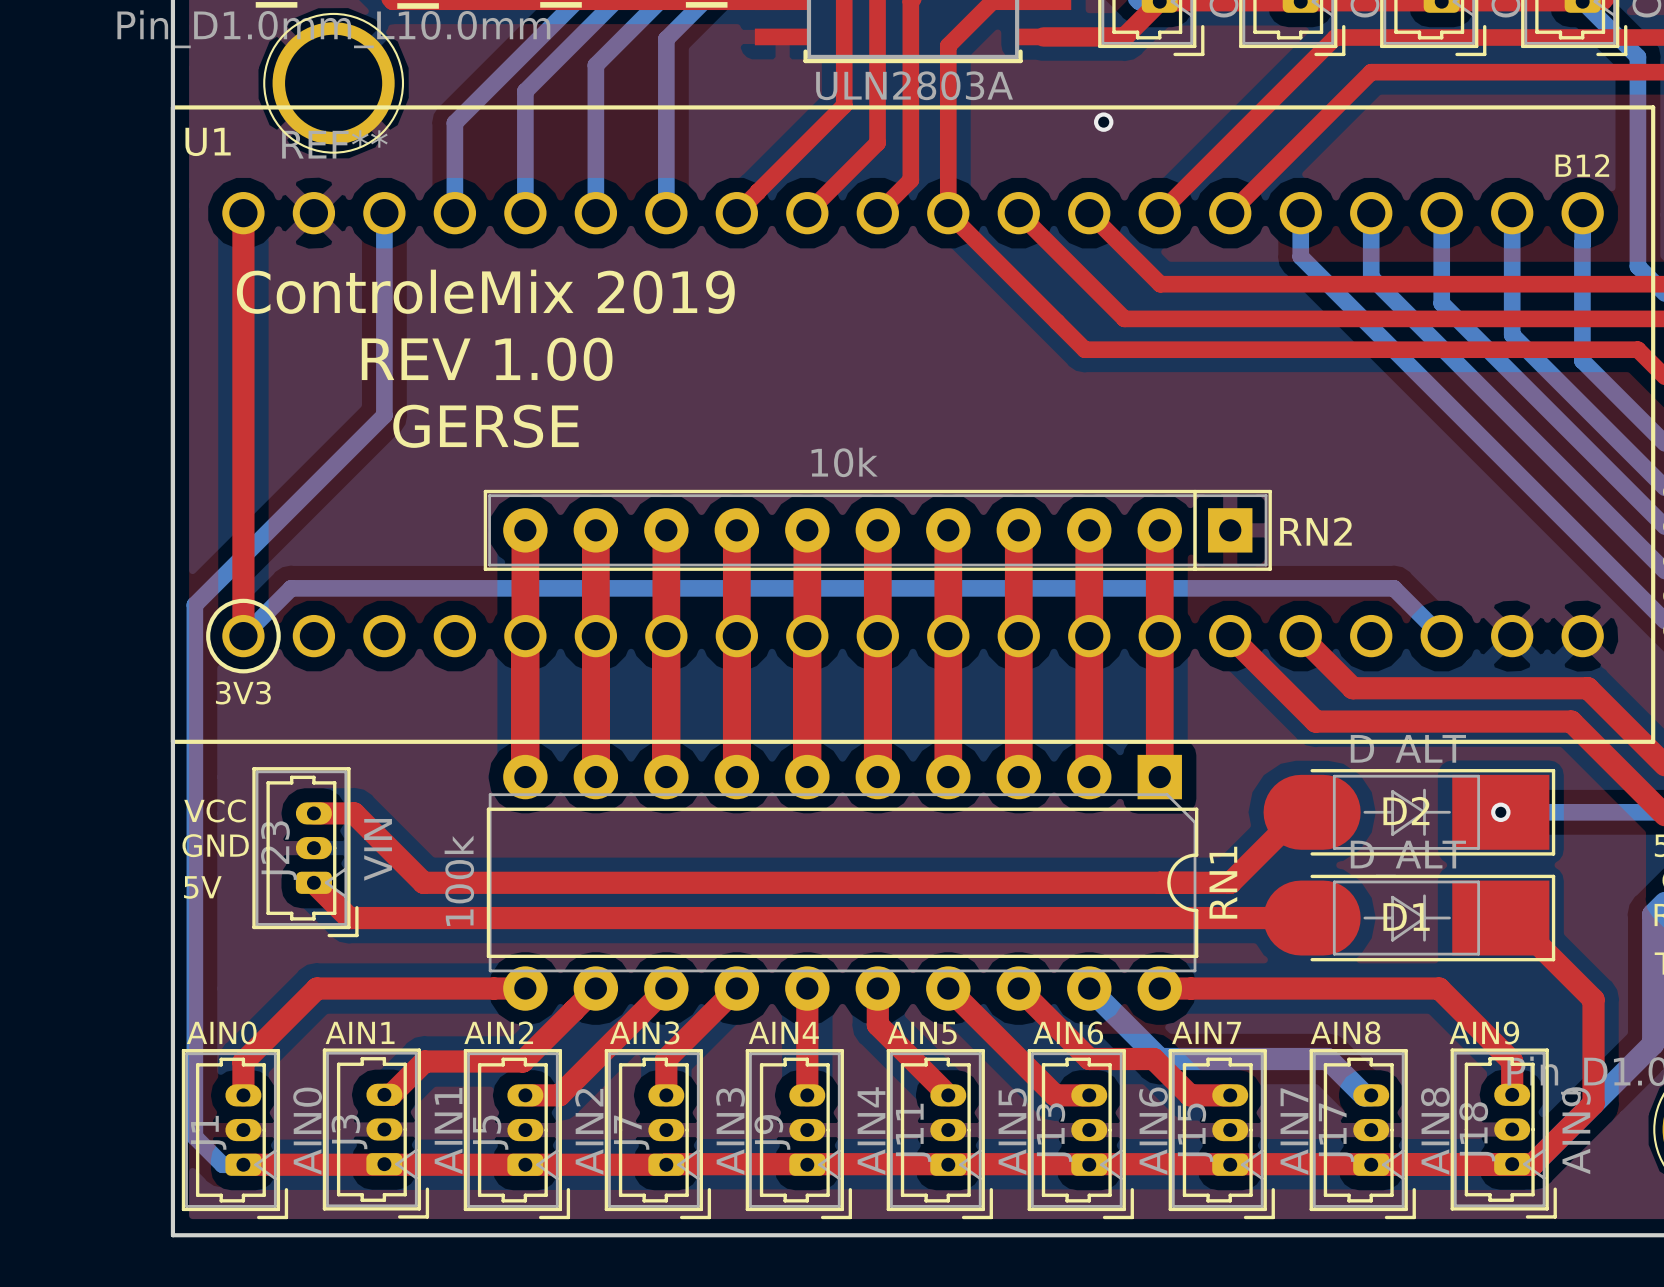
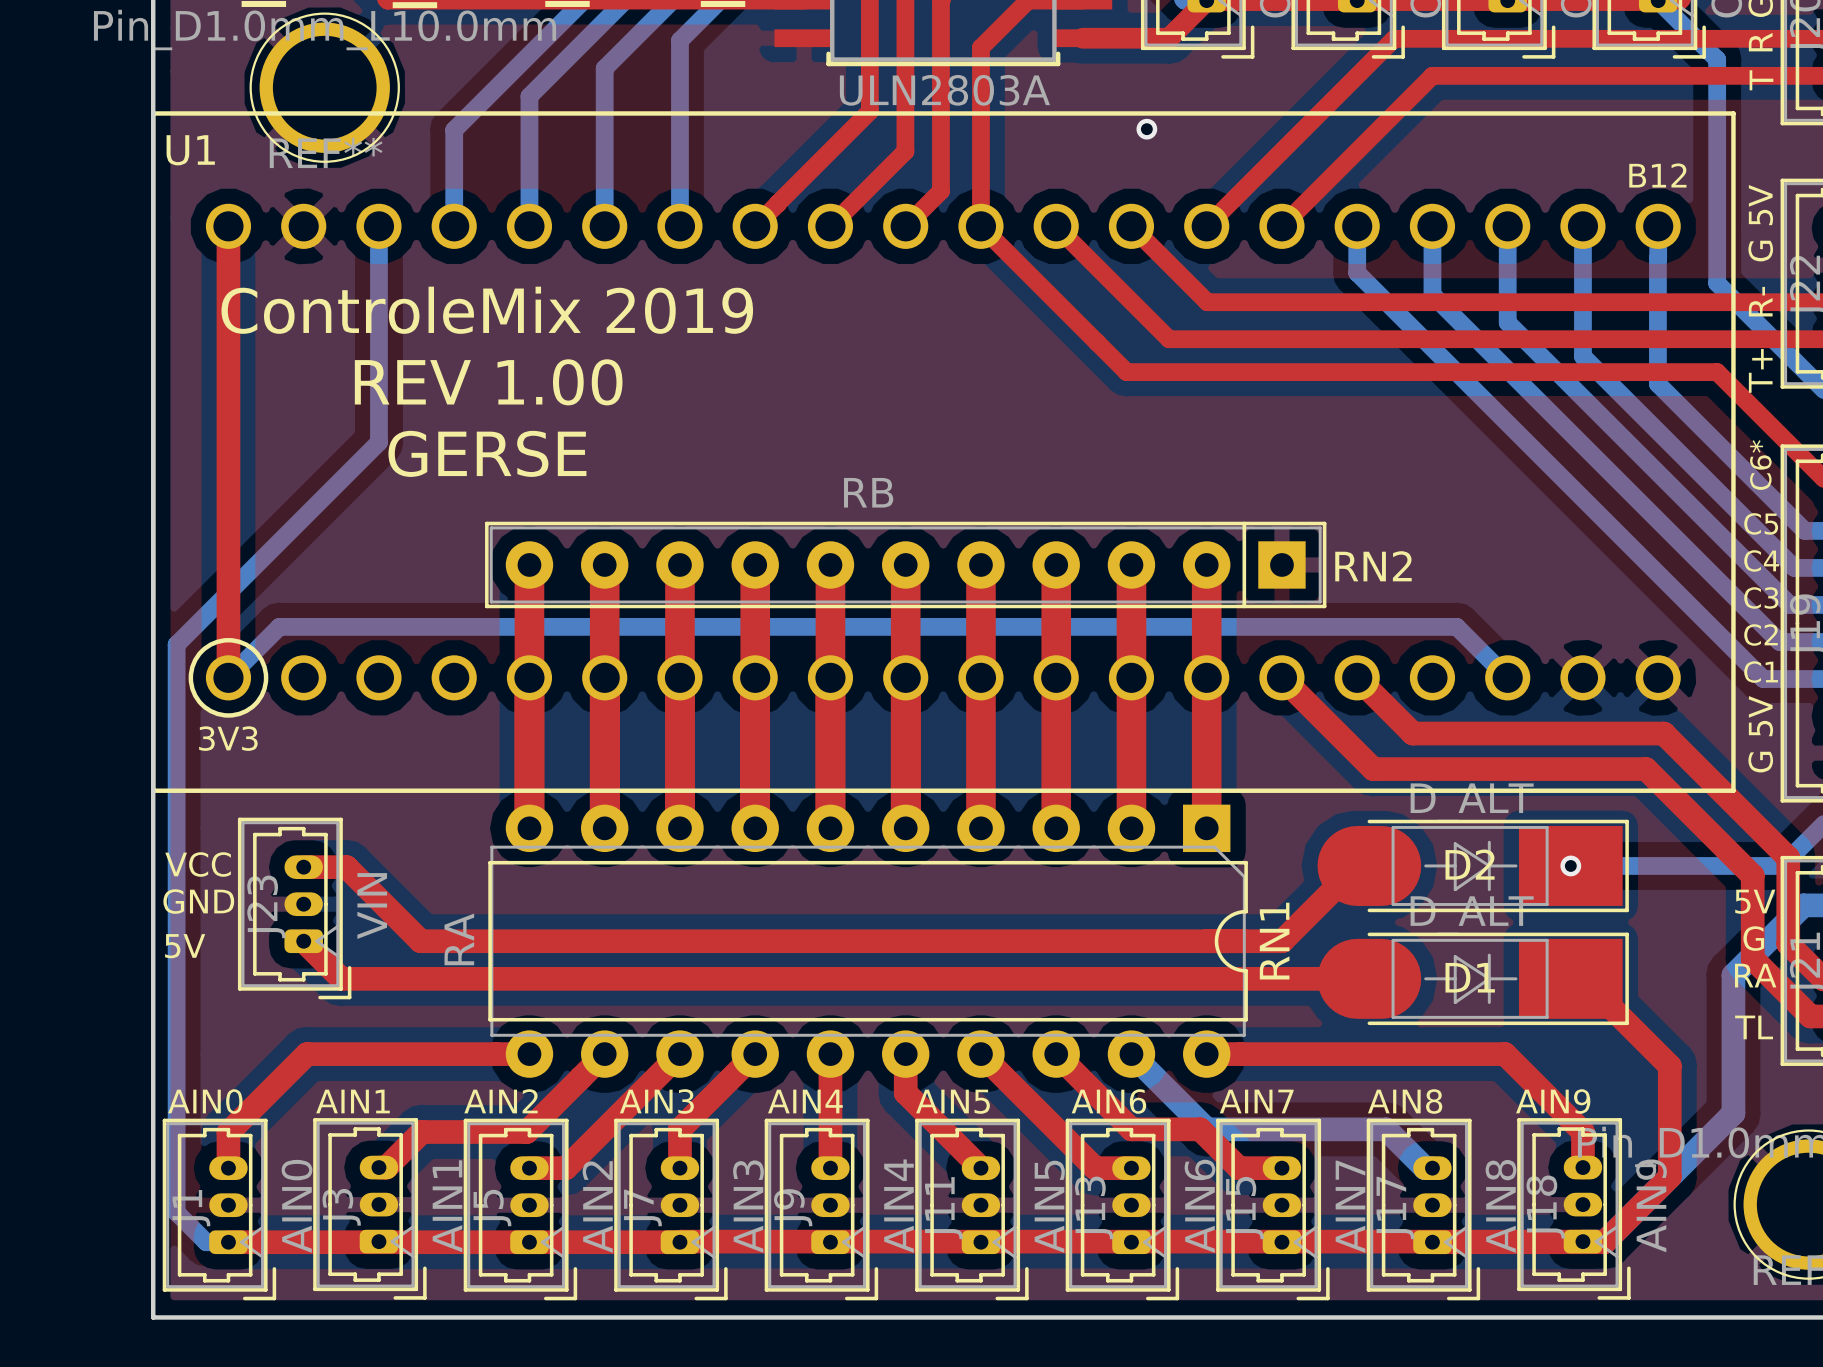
RN2 value: 10k (844, 462) -> RB (868, 492)
RN1 value: 100k (459, 880) -> RA (459, 939)

